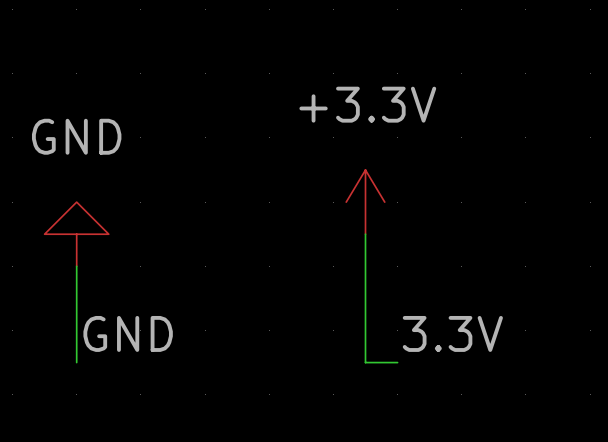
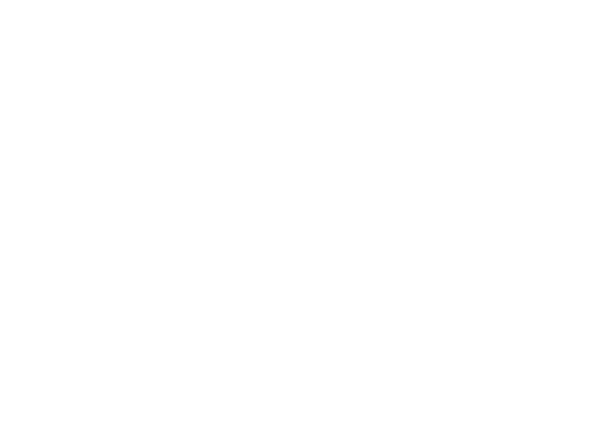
power symbol: +3.3V (365, 202) -> none
power symbol: GND (76, 234) -> none
wire: (365, 234) (365, 362) (397, 362) -> none
wire: (76, 266) (76, 362) -> none
label: GND (128, 333) -> none
label: 3.3V (452, 333) -> none

